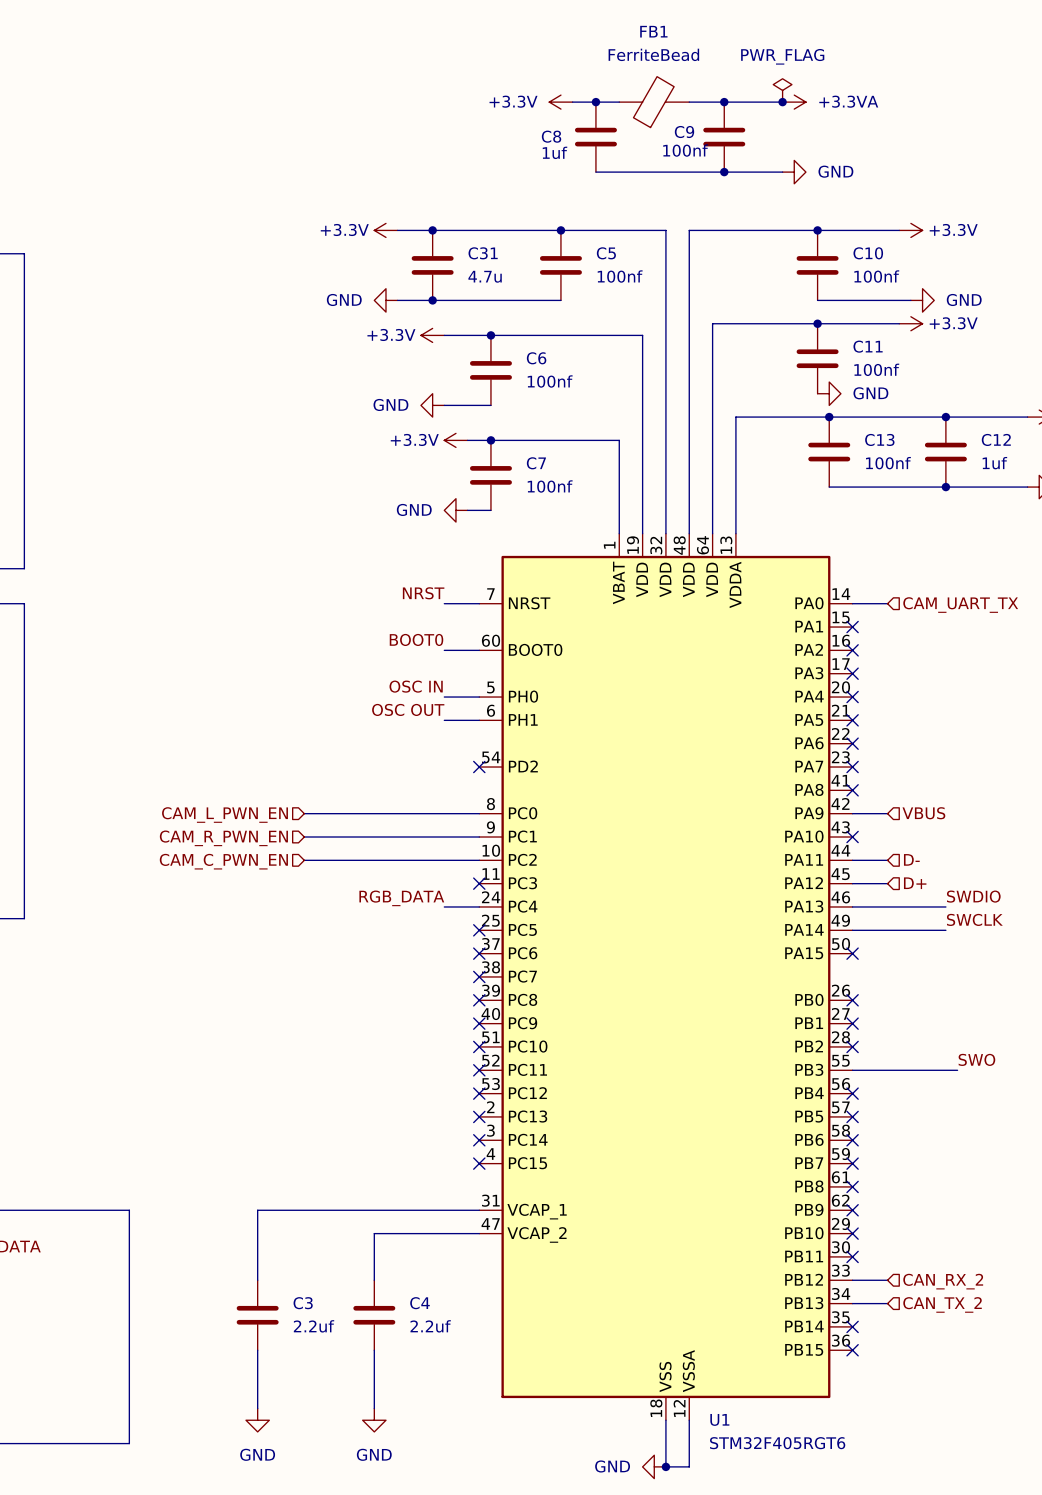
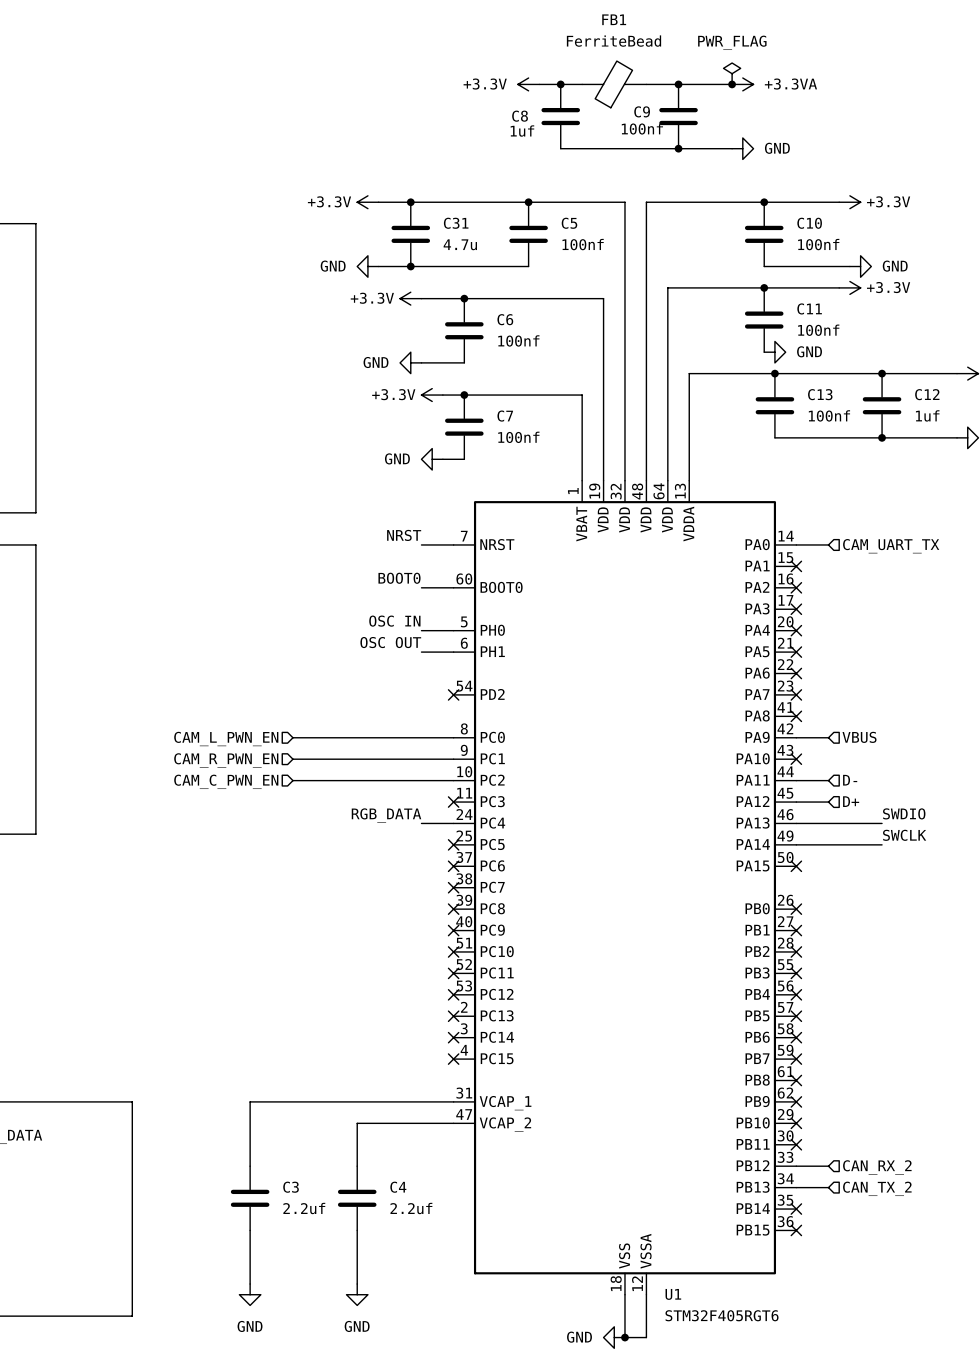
label: SWO (976, 1059) -> none
wire: (852, 1070) (957, 1070) -> none
no-connect mark: none -> (796, 973)

